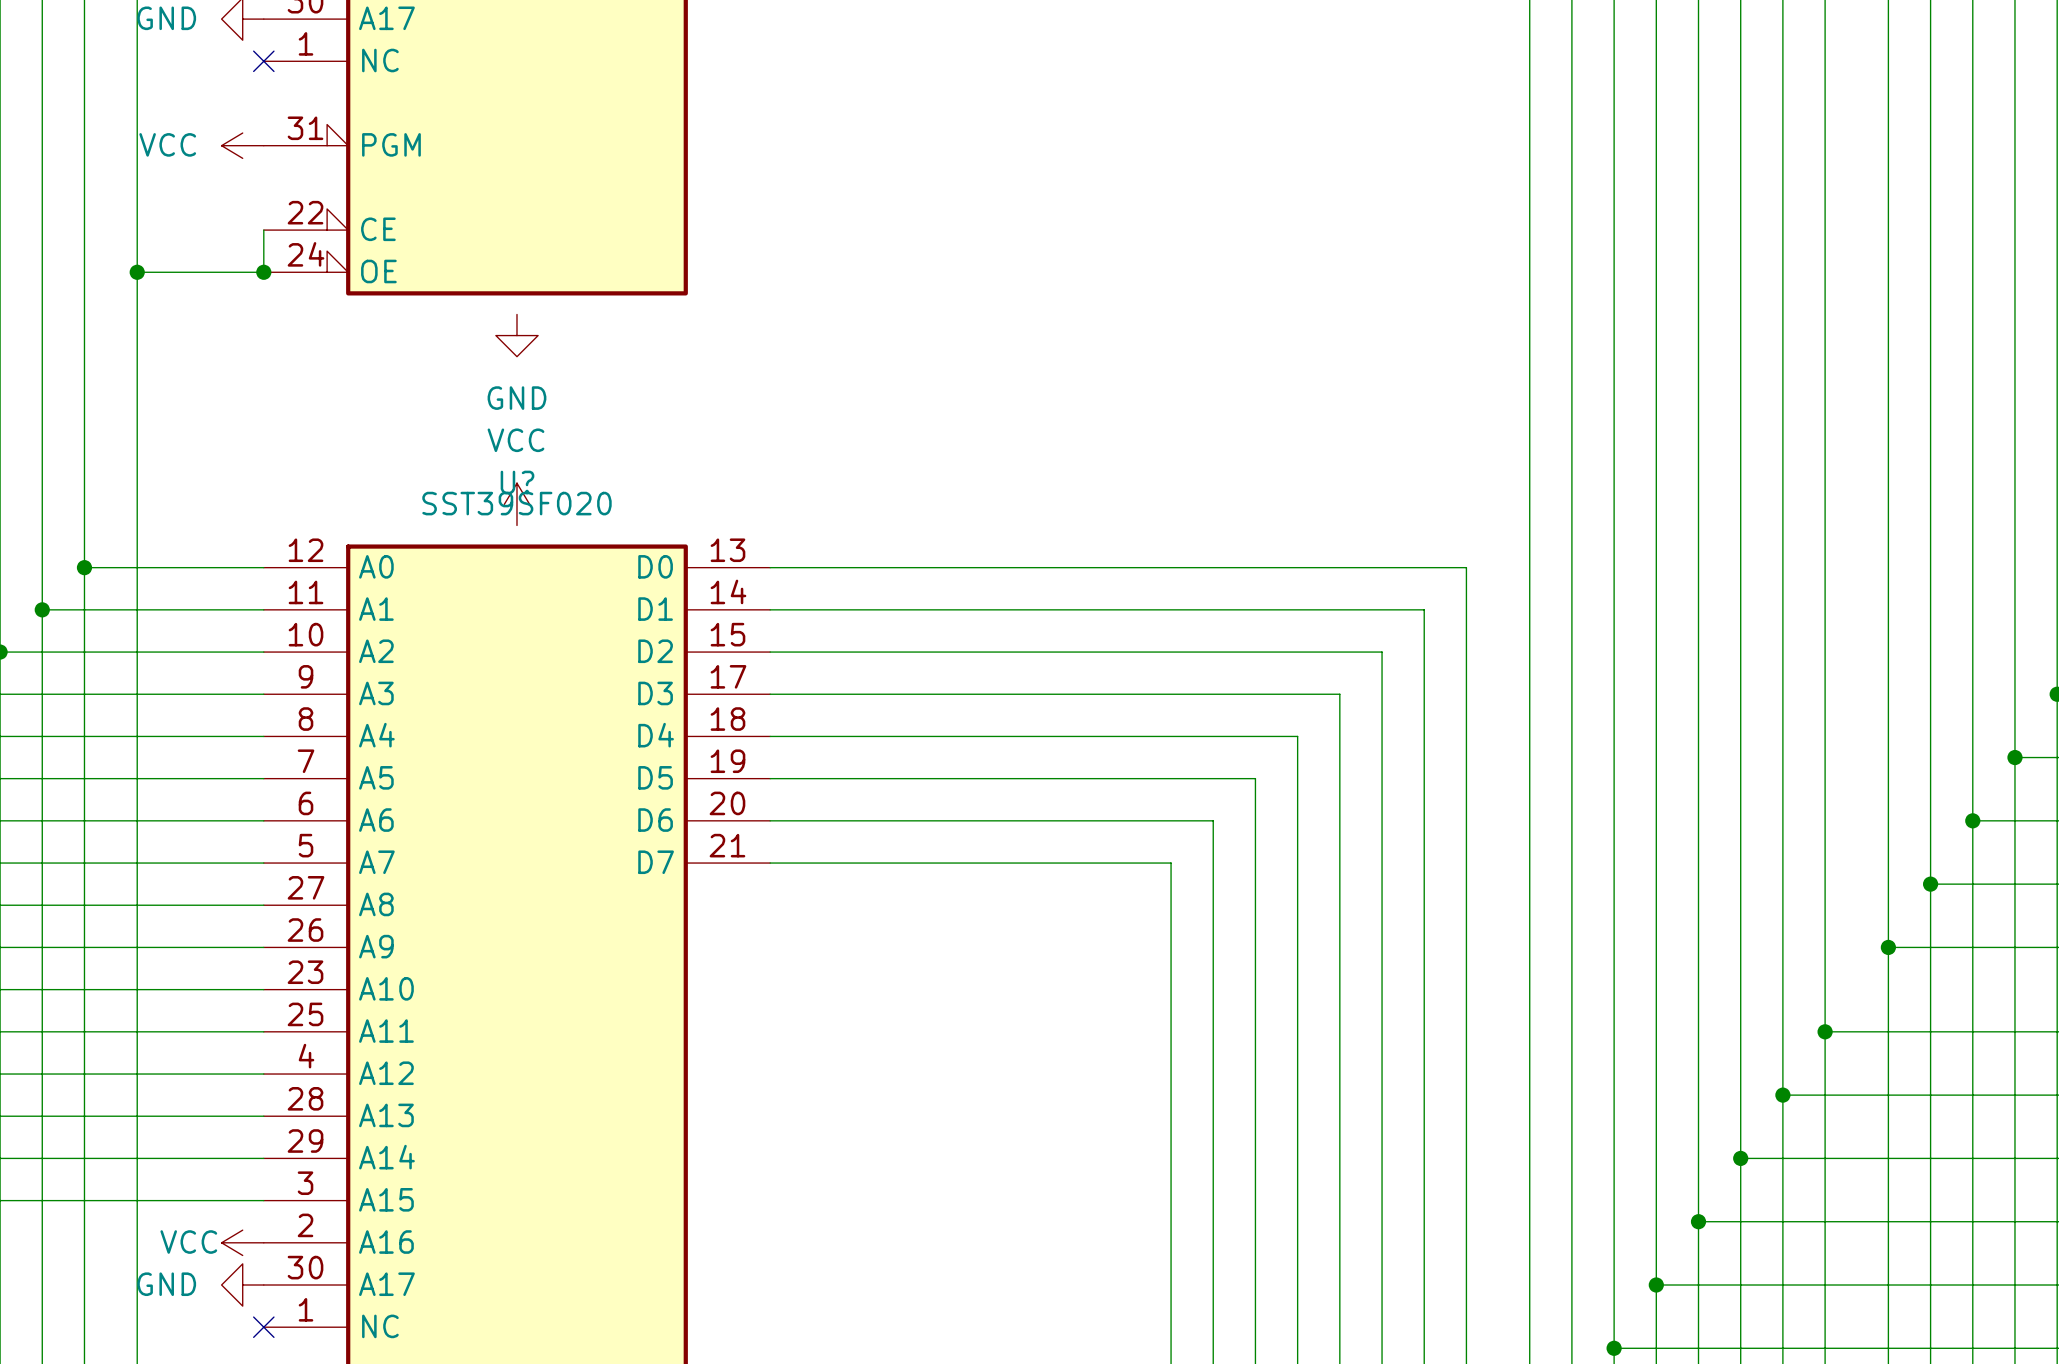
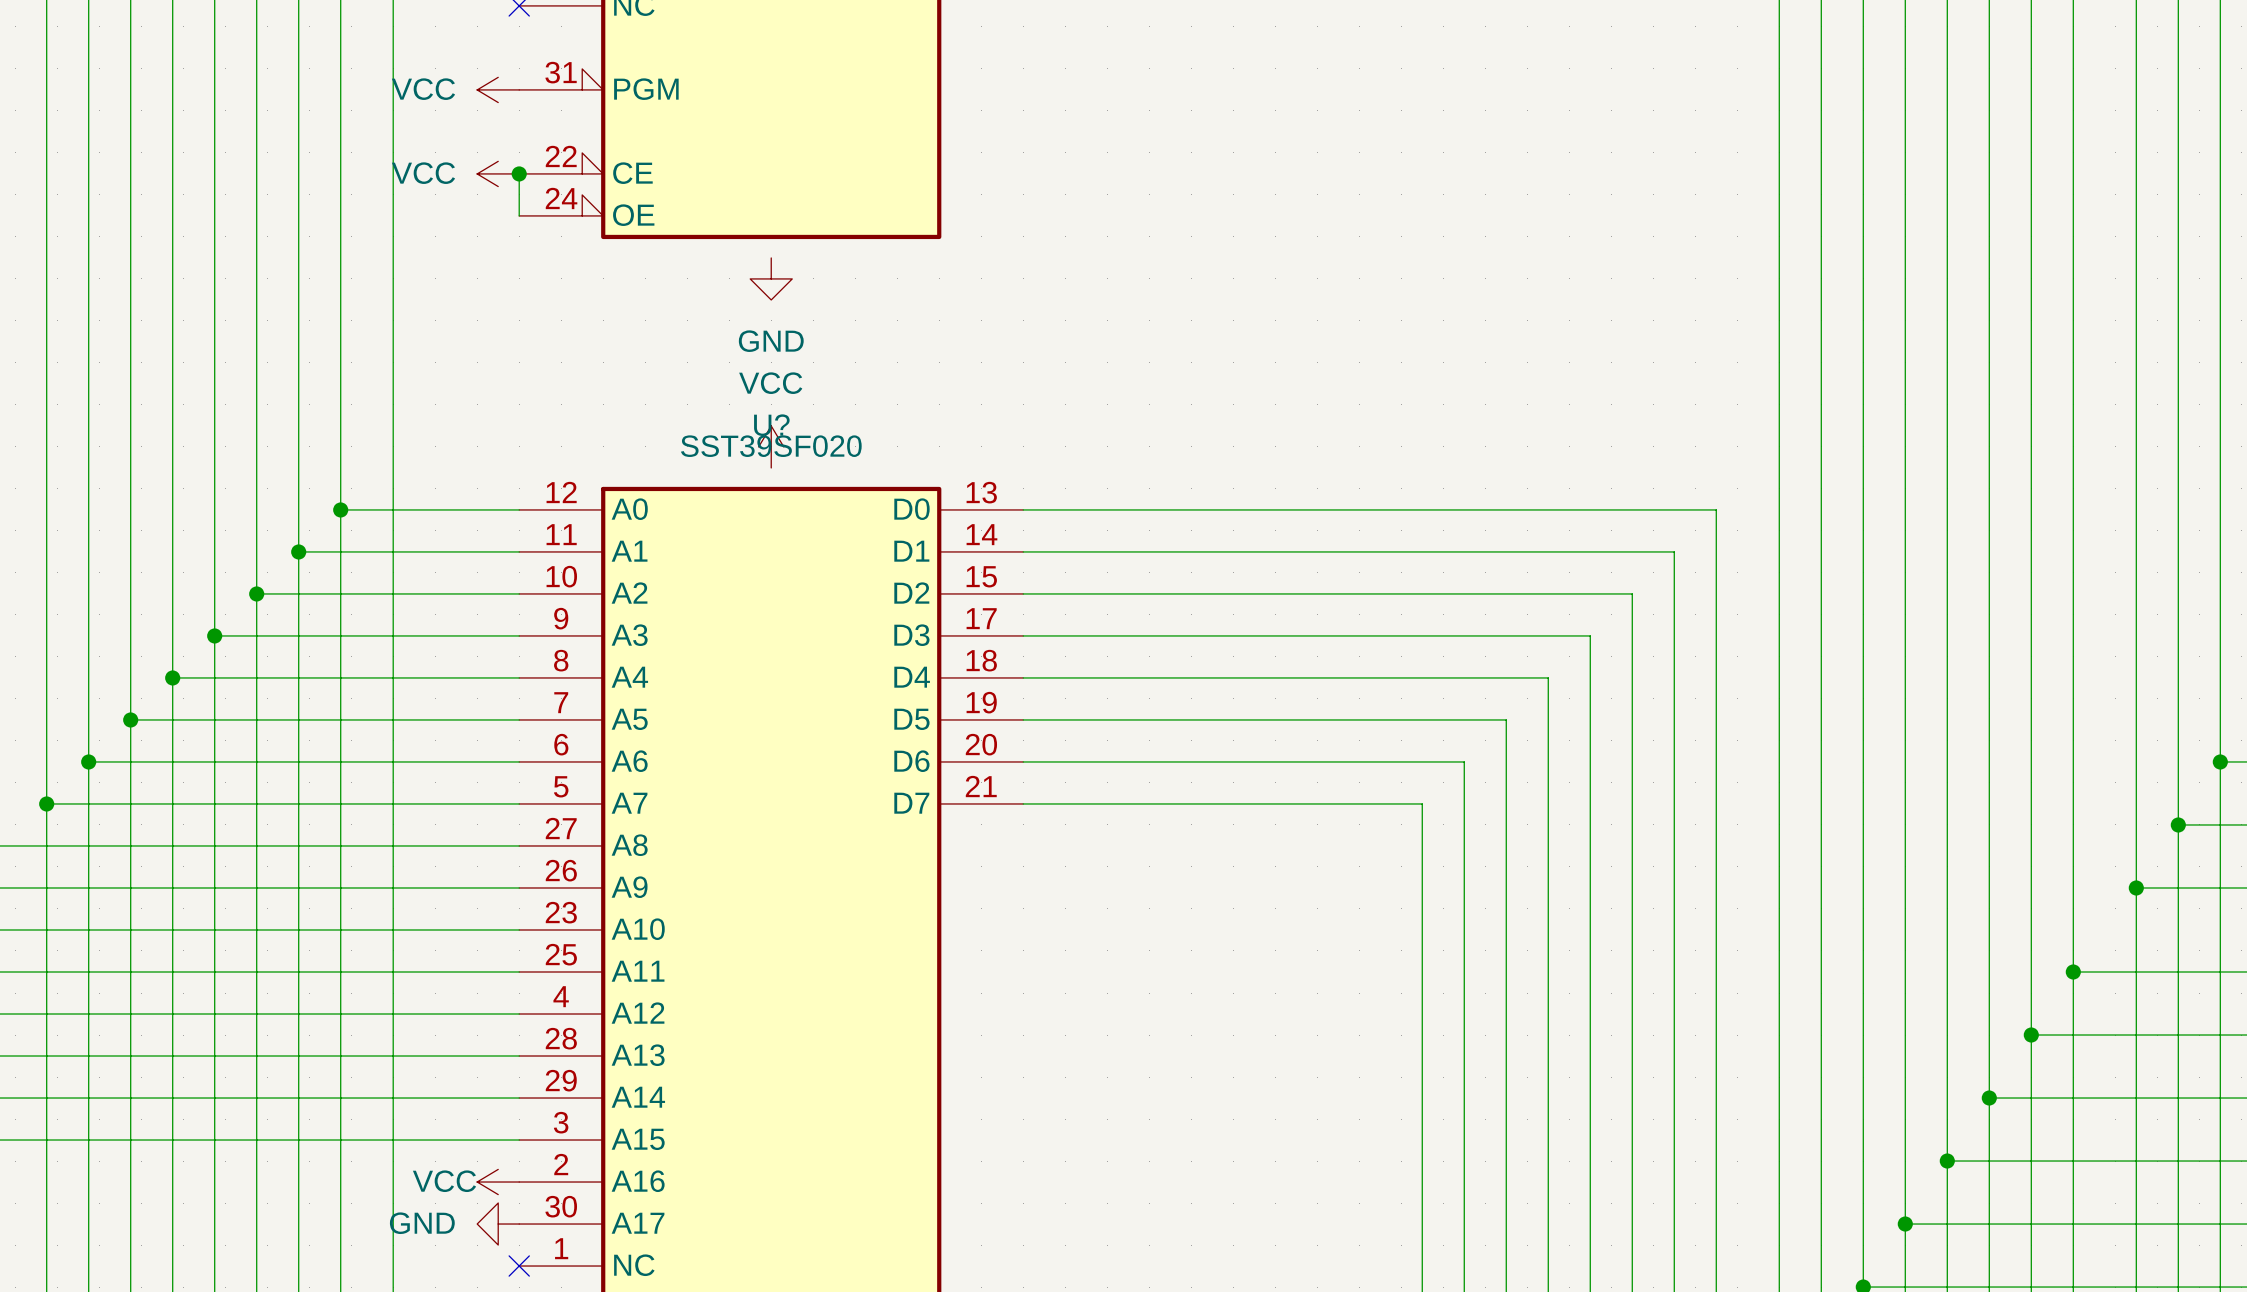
power symbol: none -> VCC (498, 173)
wire: (137, 272) (263, 272) -> none
junction: (137, 272) -> none
junction position: (263, 272) -> (519, 173)

